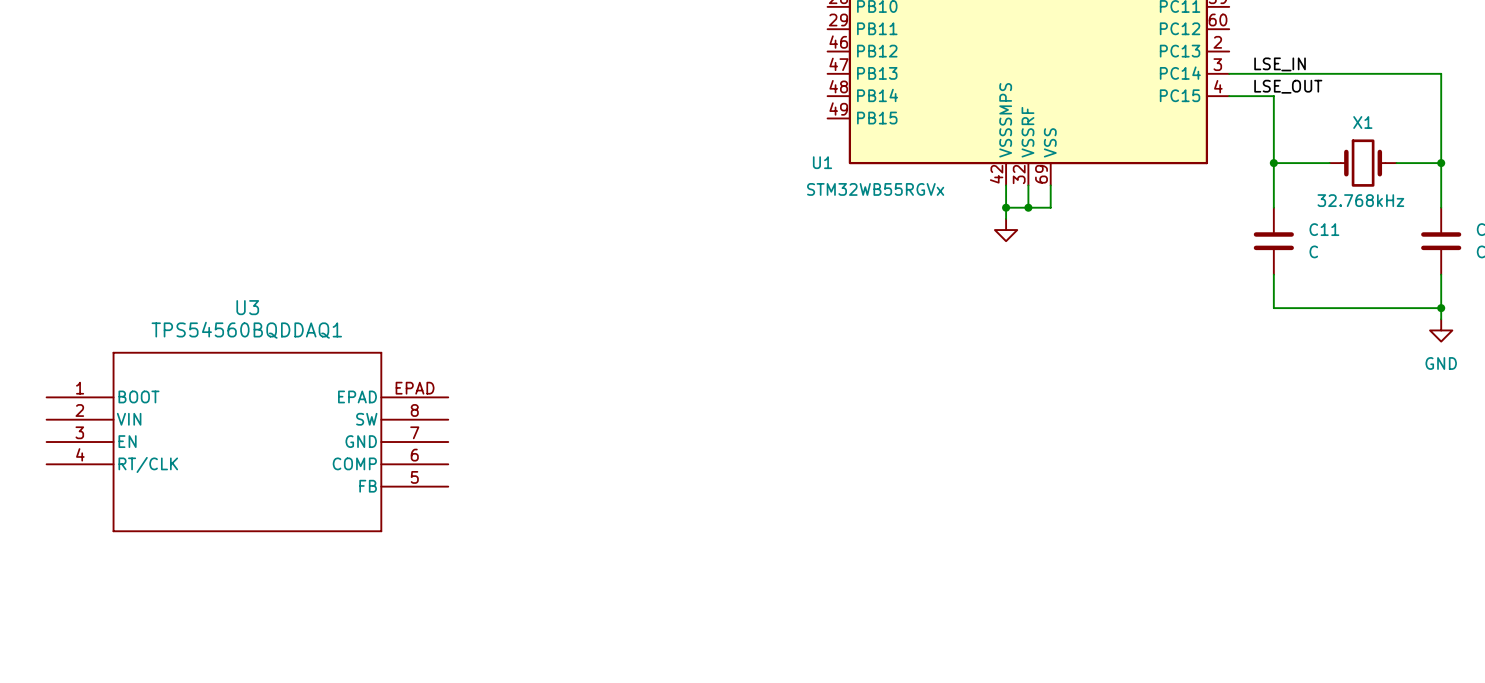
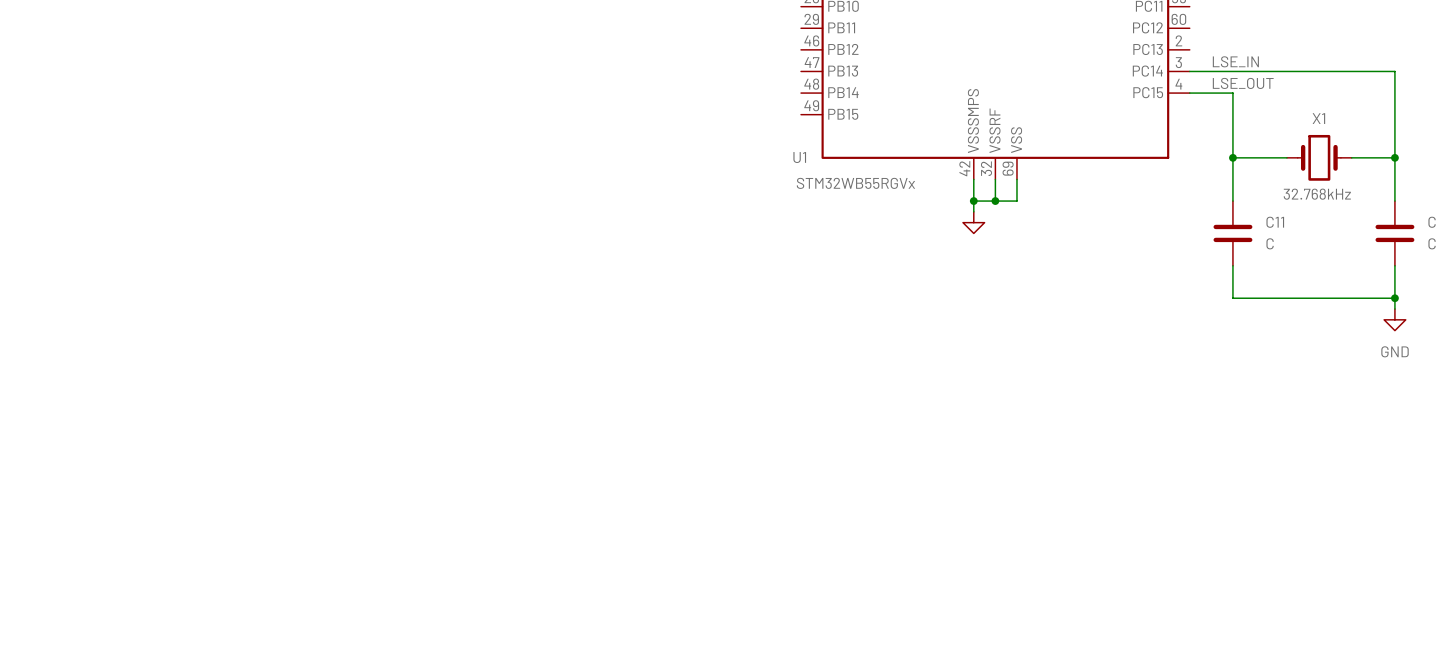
U3: TPS54560BQDDAQ1 (247, 442) -> none

